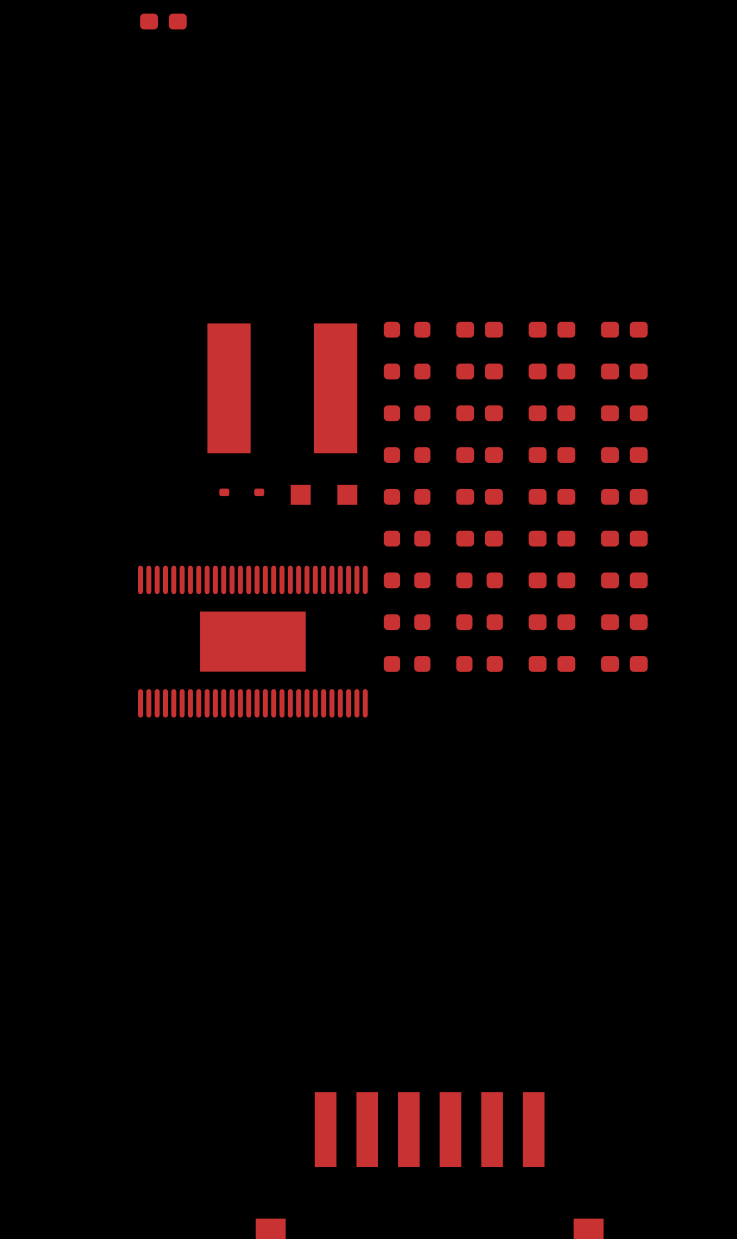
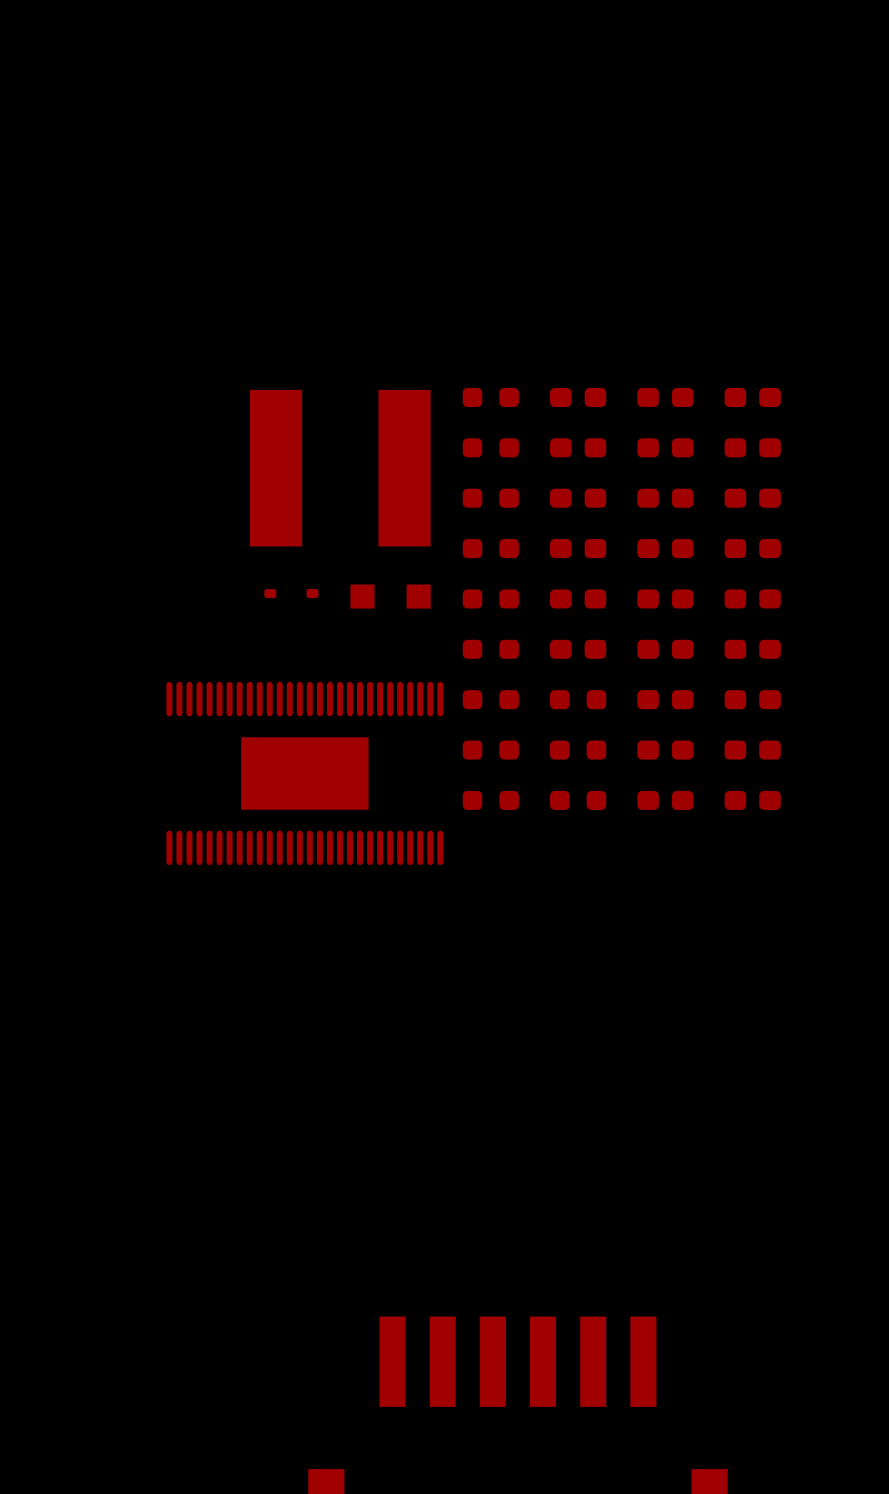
part: (163, 21) -> none

